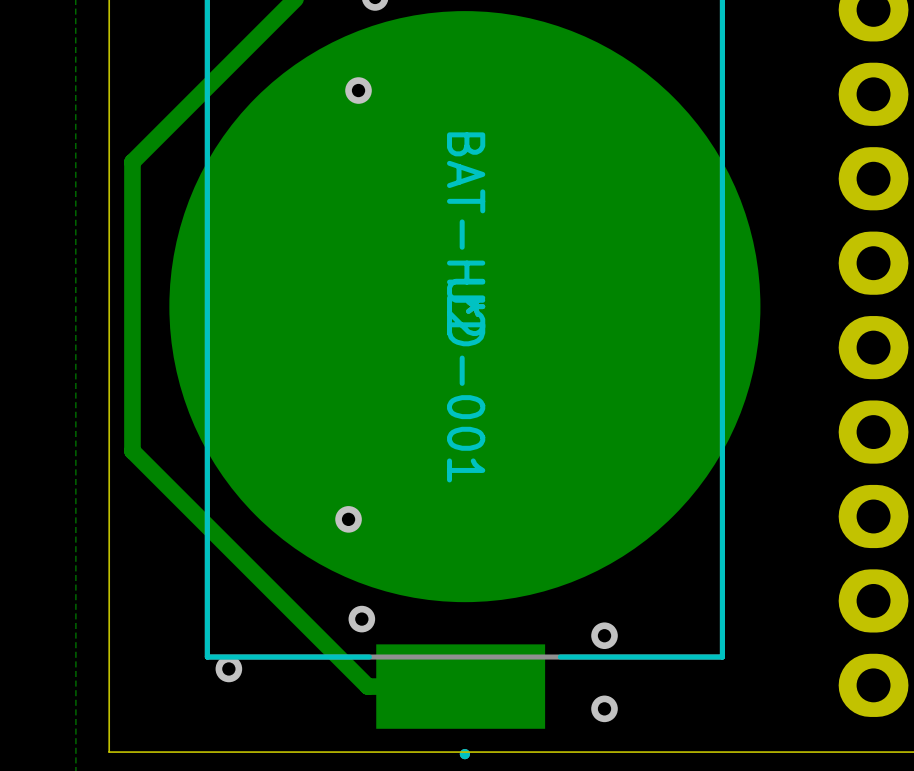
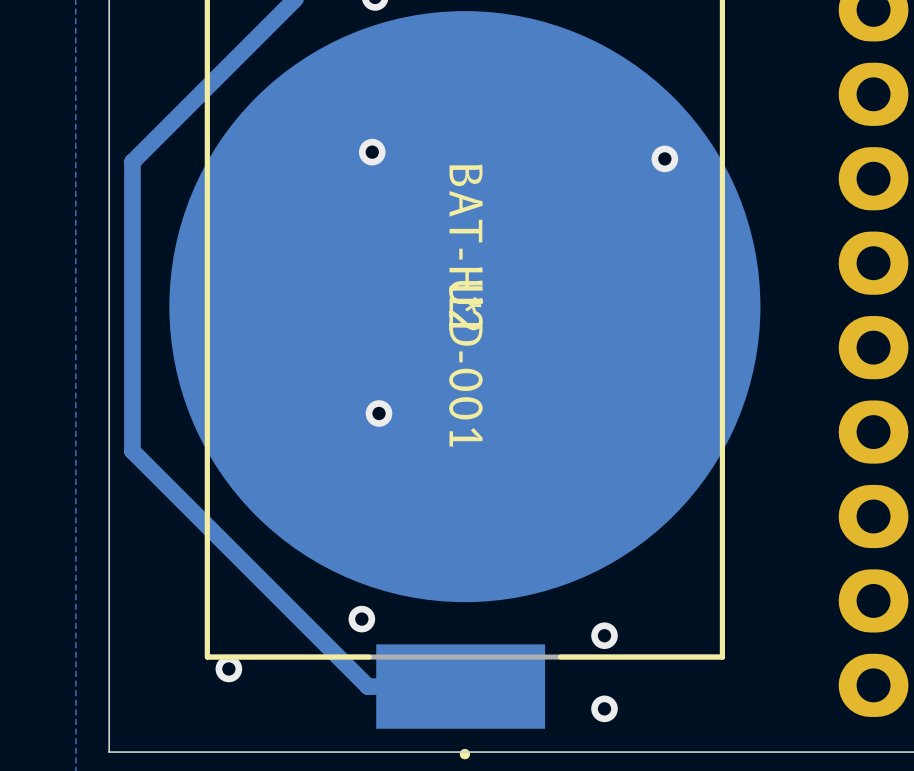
via position: (358, 90) -> (372, 152)
via: none -> (664, 158)
via position: (348, 519) -> (379, 413)

